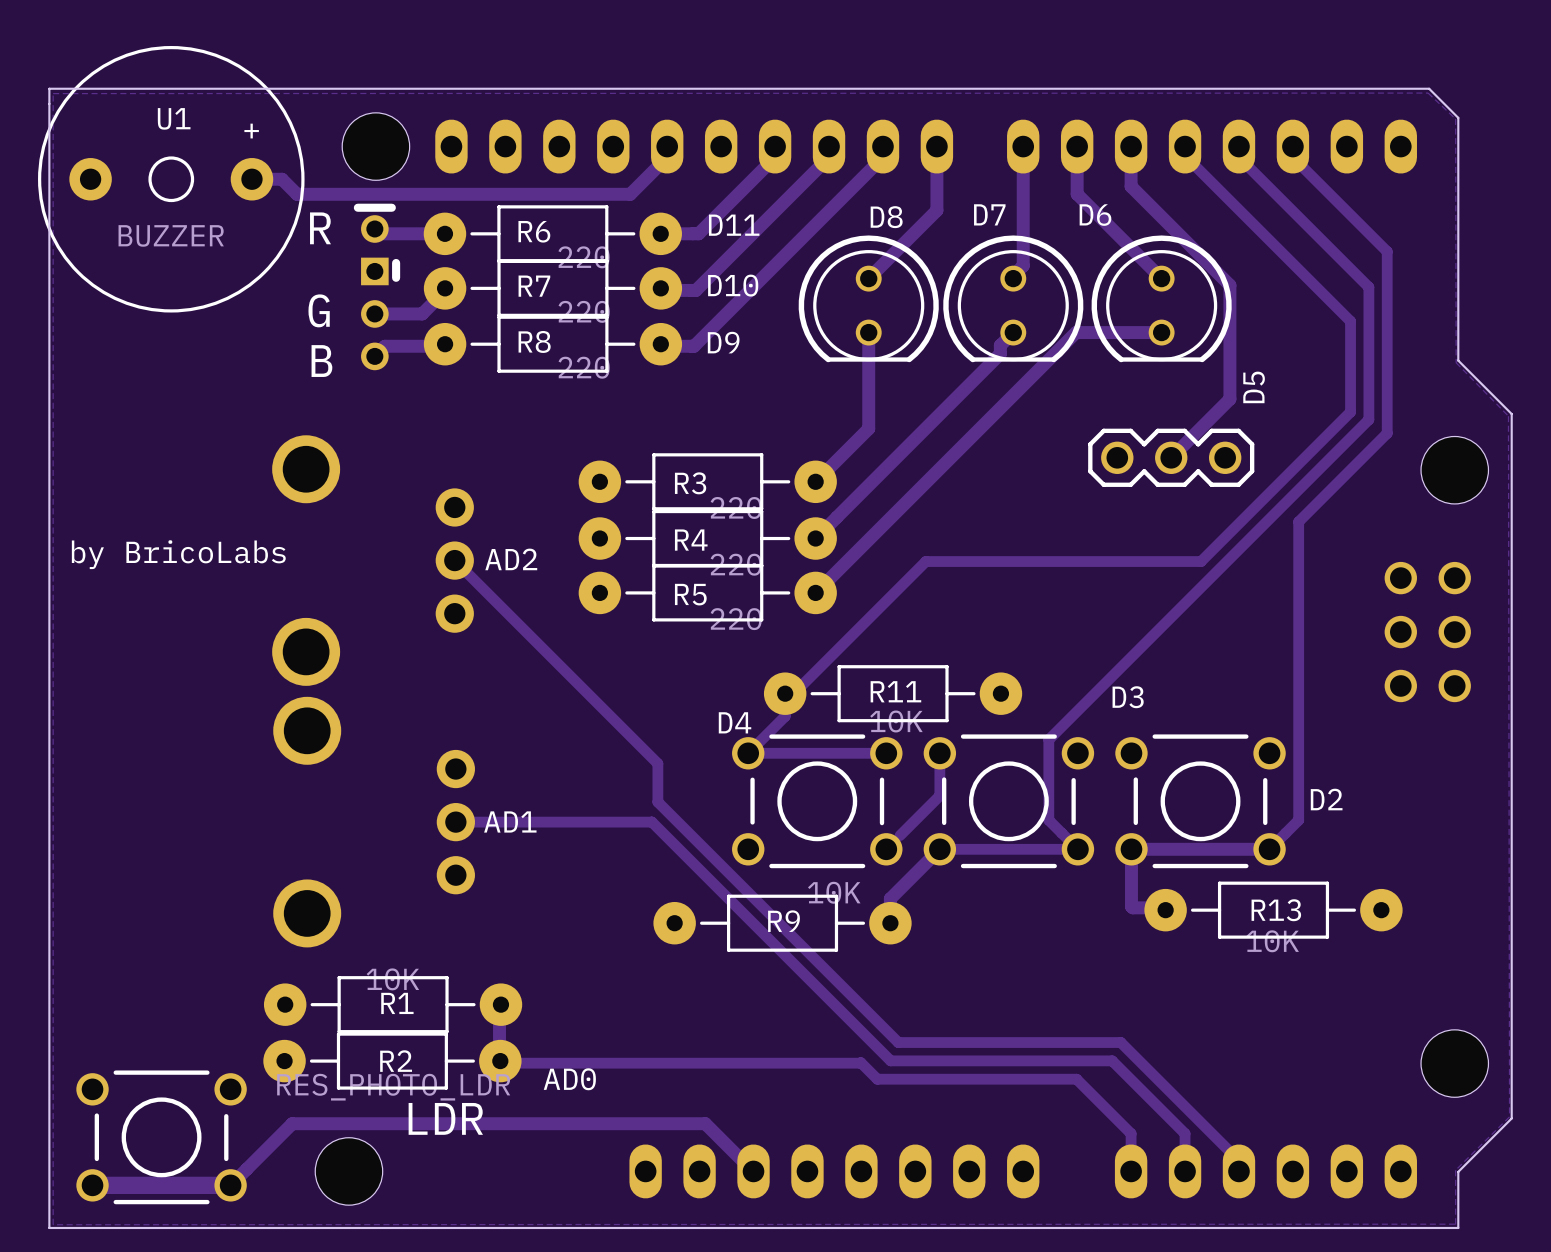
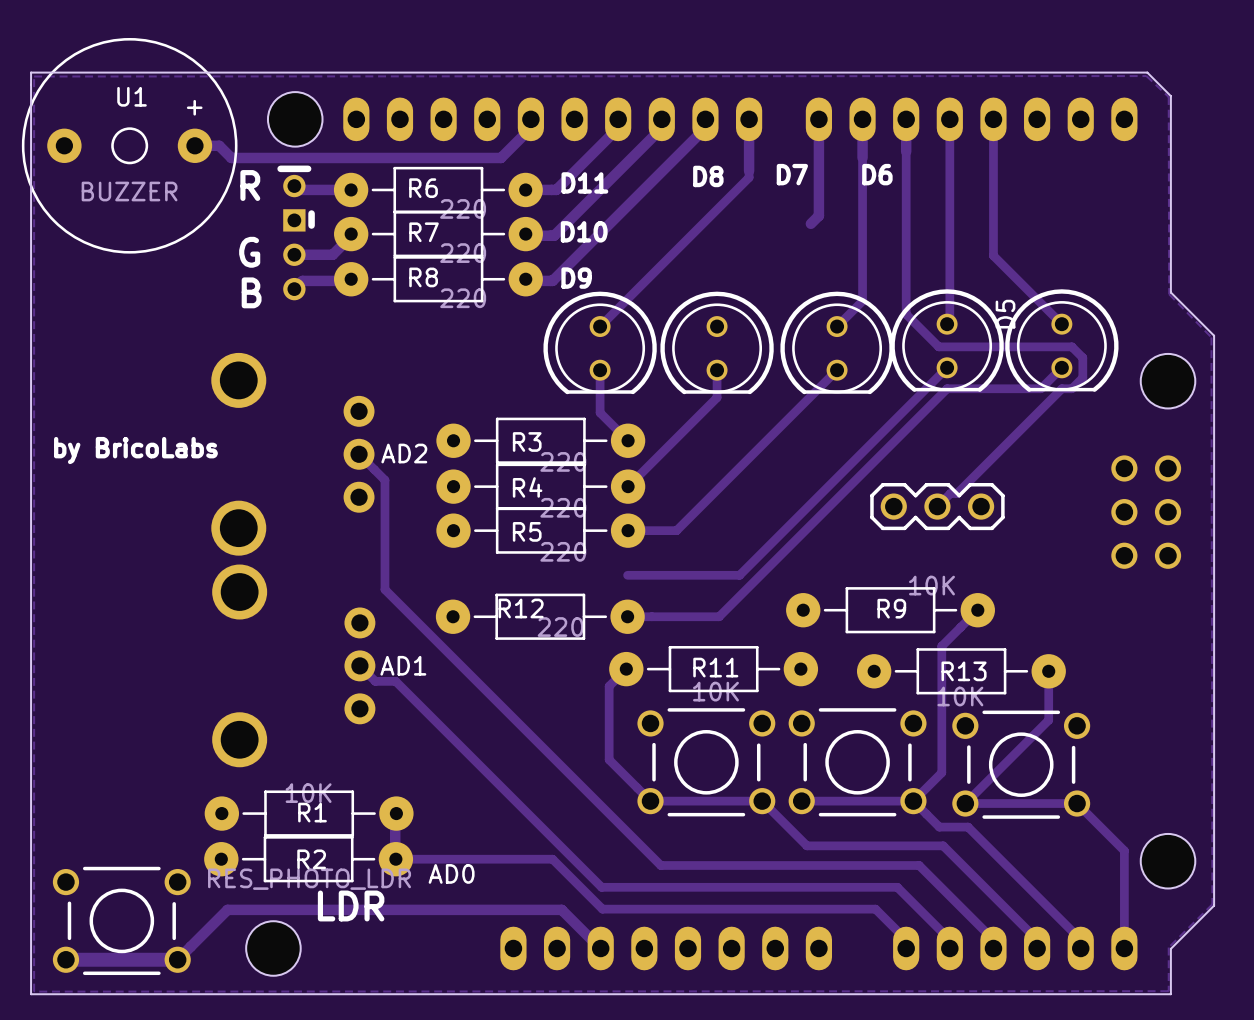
track: (1293, 146) (1292, 157) (1387, 251) (1387, 433) (1298, 521) (1298, 820) (1269, 849) (1131, 849) (1131, 906) (1162, 907) -> none
track: (1185, 155) (1350, 321) (1350, 412) (1201, 561) (925, 561) (793, 693) -> (949, 126) (949, 321) (947, 324)
track: (1238, 157) (1368, 287) (1368, 419) (1048, 739) (1048, 820) (1077, 849) (939, 849) (890, 898) (890, 923) -> (993, 128) (993, 255) (1061, 324)
track: (1131, 186) (1229, 285) (1229, 399) (1171, 457) -> (906, 151) (906, 314) (938, 346) (1071, 346) (1082, 357) (1082, 377) (1071, 388) (1061, 388) (957, 493) (950, 493) (937, 506)
track: (1077, 194) (1161, 278) -> (862, 157) (862, 301) (837, 326)
track: (936, 210) (868, 278) -> (749, 171) (749, 177) (600, 326)
part: (868, 298) -> none
part: (1013, 298) -> none
part: (1161, 298) -> none
track: (868, 332) (868, 428) (815, 481) -> none
track: (1013, 332) (1000, 345) (1000, 353) (815, 538) -> none
track: (1161, 332) (1076, 332) (815, 592) -> none
part: none -> (947, 340)
part: none -> (1061, 340)
part: none -> (600, 342)
part: none -> (717, 342)
part: none -> (837, 342)
track: none -> (947, 367) (739, 575) (627, 575)
track: none -> (1061, 367) (1040, 388) (947, 388) (719, 616) (627, 616)
track: none -> (600, 370) (600, 412) (628, 440)
track: none -> (717, 370) (717, 397) (628, 486)
track: none -> (837, 370) (676, 530) (628, 530)
part position: (1171, 457) -> (937, 506)
R3 position: (707, 481) -> (540, 440)
R4 position: (707, 538) -> (540, 486)
track: (486, 592) (657, 763) (657, 802) (898, 1042) (1120, 1042) (1147, 1068) -> (384, 480) (384, 589) (660, 865) (919, 865)
R5 position: (707, 592) -> (540, 530)
track: (785, 693) (785, 716) (748, 753) (886, 753) -> none
R11 position: (893, 693) -> (713, 669)
text: D3 (1128, 697) -> none
text: D4 (735, 722) -> none
track: (939, 753) (939, 795) (900, 835) -> none
track: none -> (977, 610) (941, 646) (941, 772) (913, 801)
R12: none -> 220 (540, 616)
text: D2 (1326, 799) -> none
part: (817, 801) -> none
part: (1008, 801) -> none
part: (1200, 801) -> none
track: (455, 822) (651, 822) (890, 1060) (1112, 1060) (1185, 1133) (1185, 1160) -> (359, 665) (375, 681) (395, 681) (601, 887) (897, 887) (949, 939)
track: none -> (626, 669) (609, 686) (609, 759) (650, 801) (762, 801) (806, 845) (943, 845) (1037, 939) (1037, 948)
track: none -> (1048, 671) (1048, 720) (965, 803) (1077, 803) (1124, 850) (1124, 948)
R13 position: (1273, 910) -> (961, 671)
R9 position: (782, 923) -> (890, 610)
part: none -> (706, 762)
part: none -> (857, 762)
part: none -> (1021, 764)
track: none -> (801, 801) (913, 801)
track: none -> (913, 801) (939, 827) (968, 827) (1080, 939) (1080, 948)
track: (499, 1063) (860, 1062) (877, 1079) (1076, 1079) (1131, 1133) (1131, 1160) -> (395, 859) (552, 859) (602, 909) (875, 909) (906, 939)

